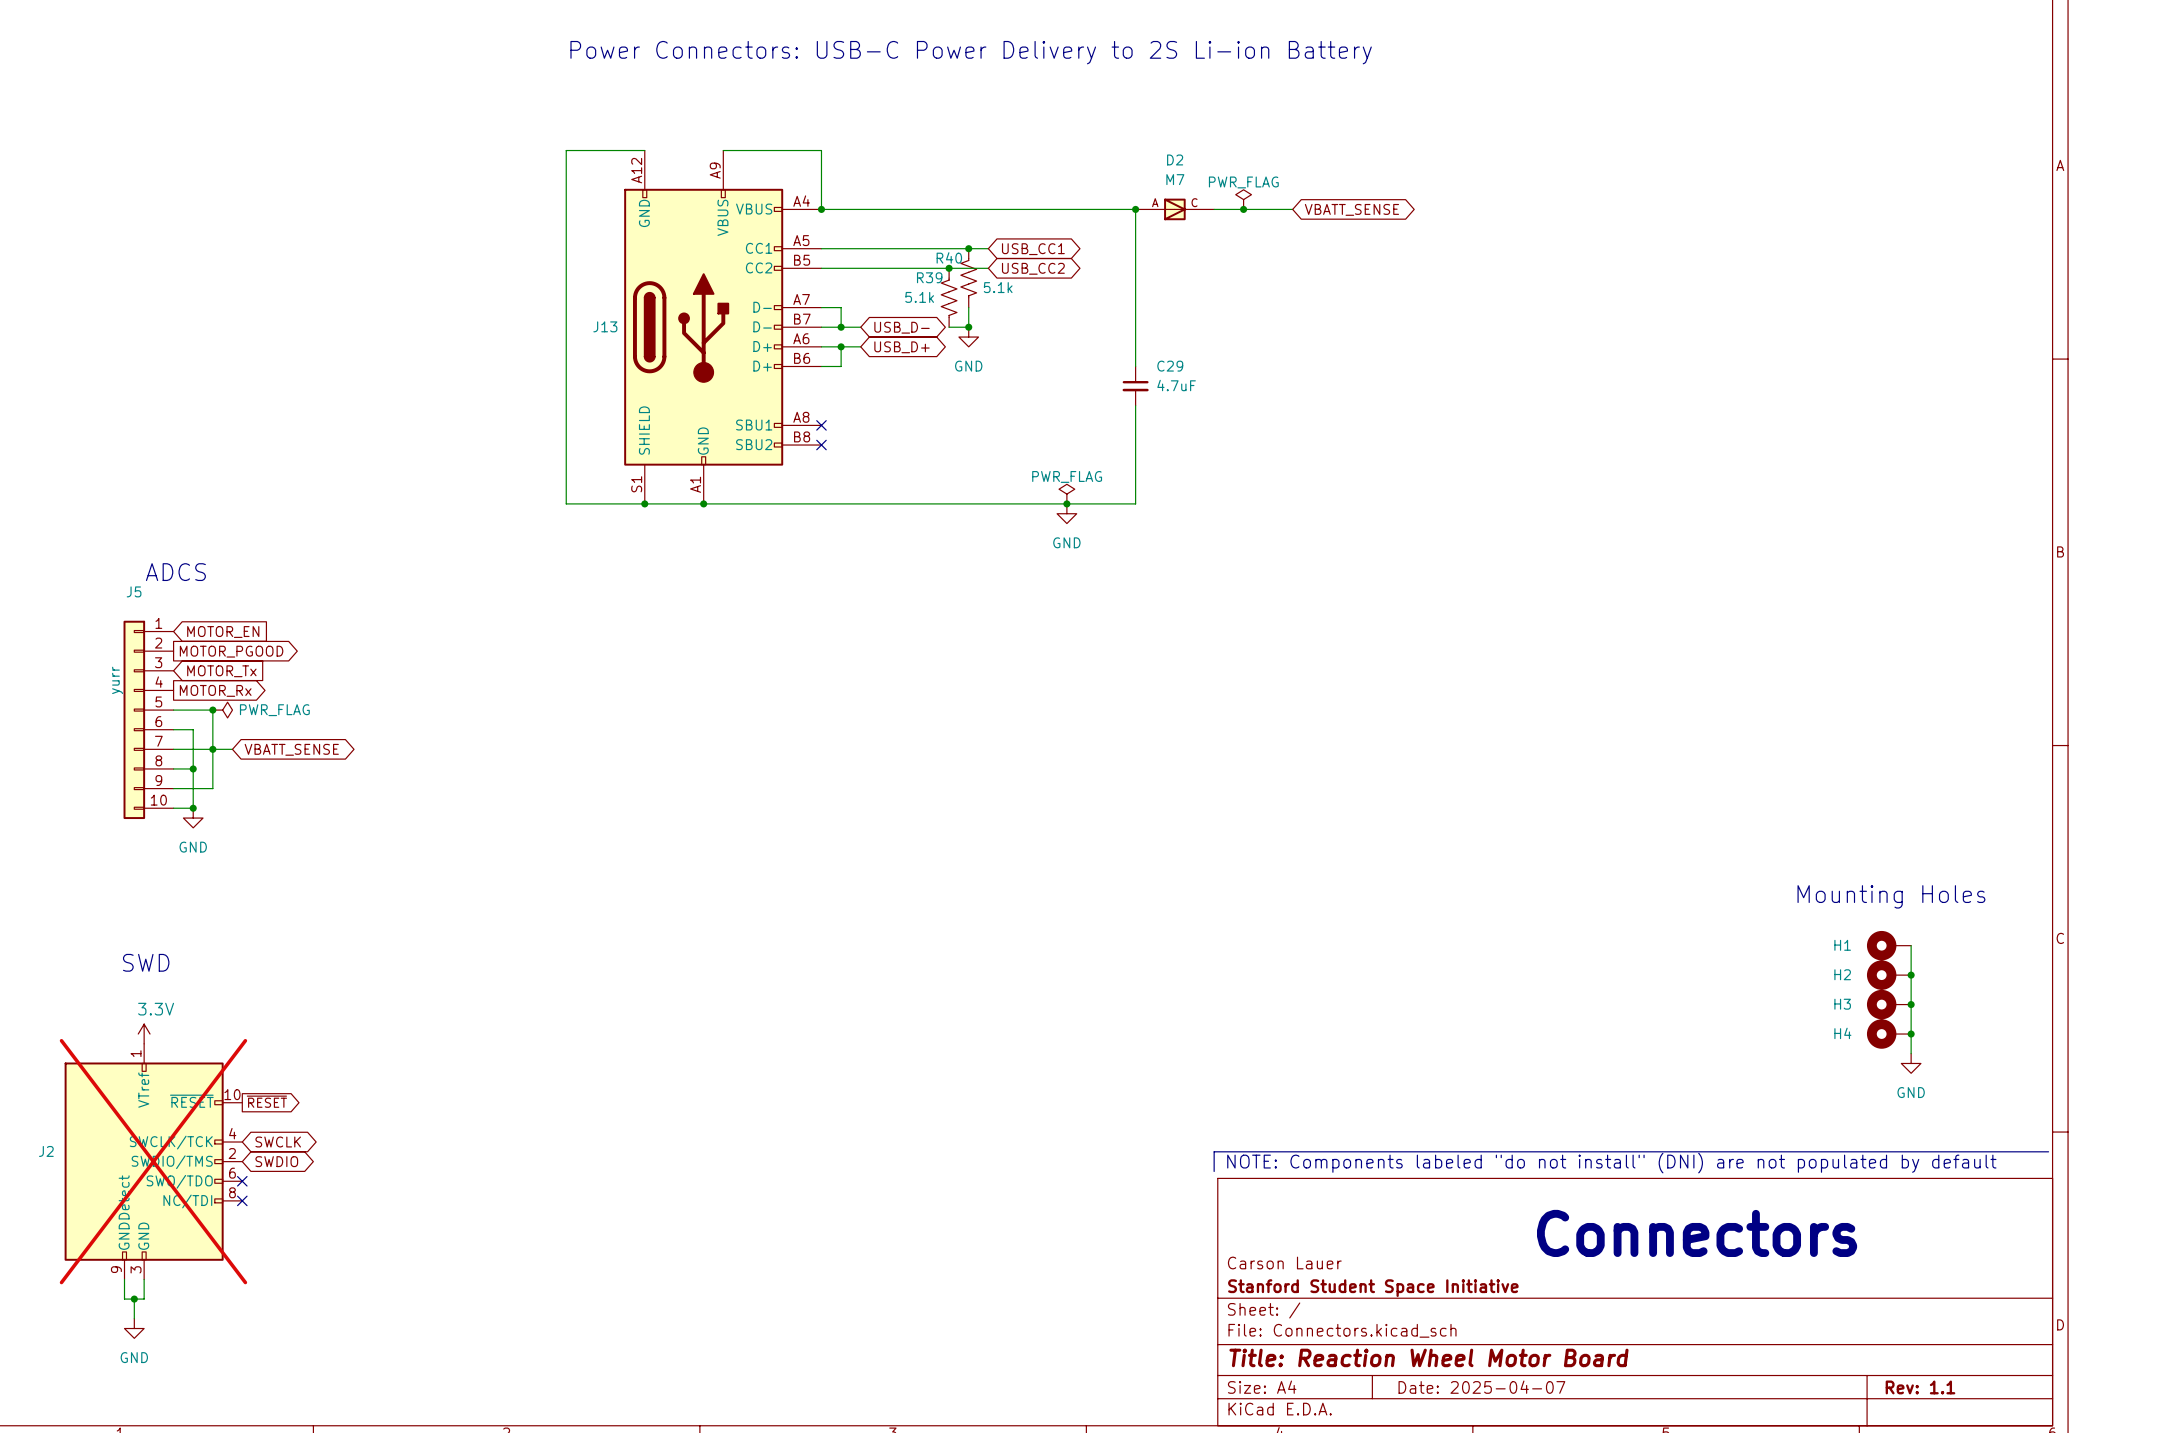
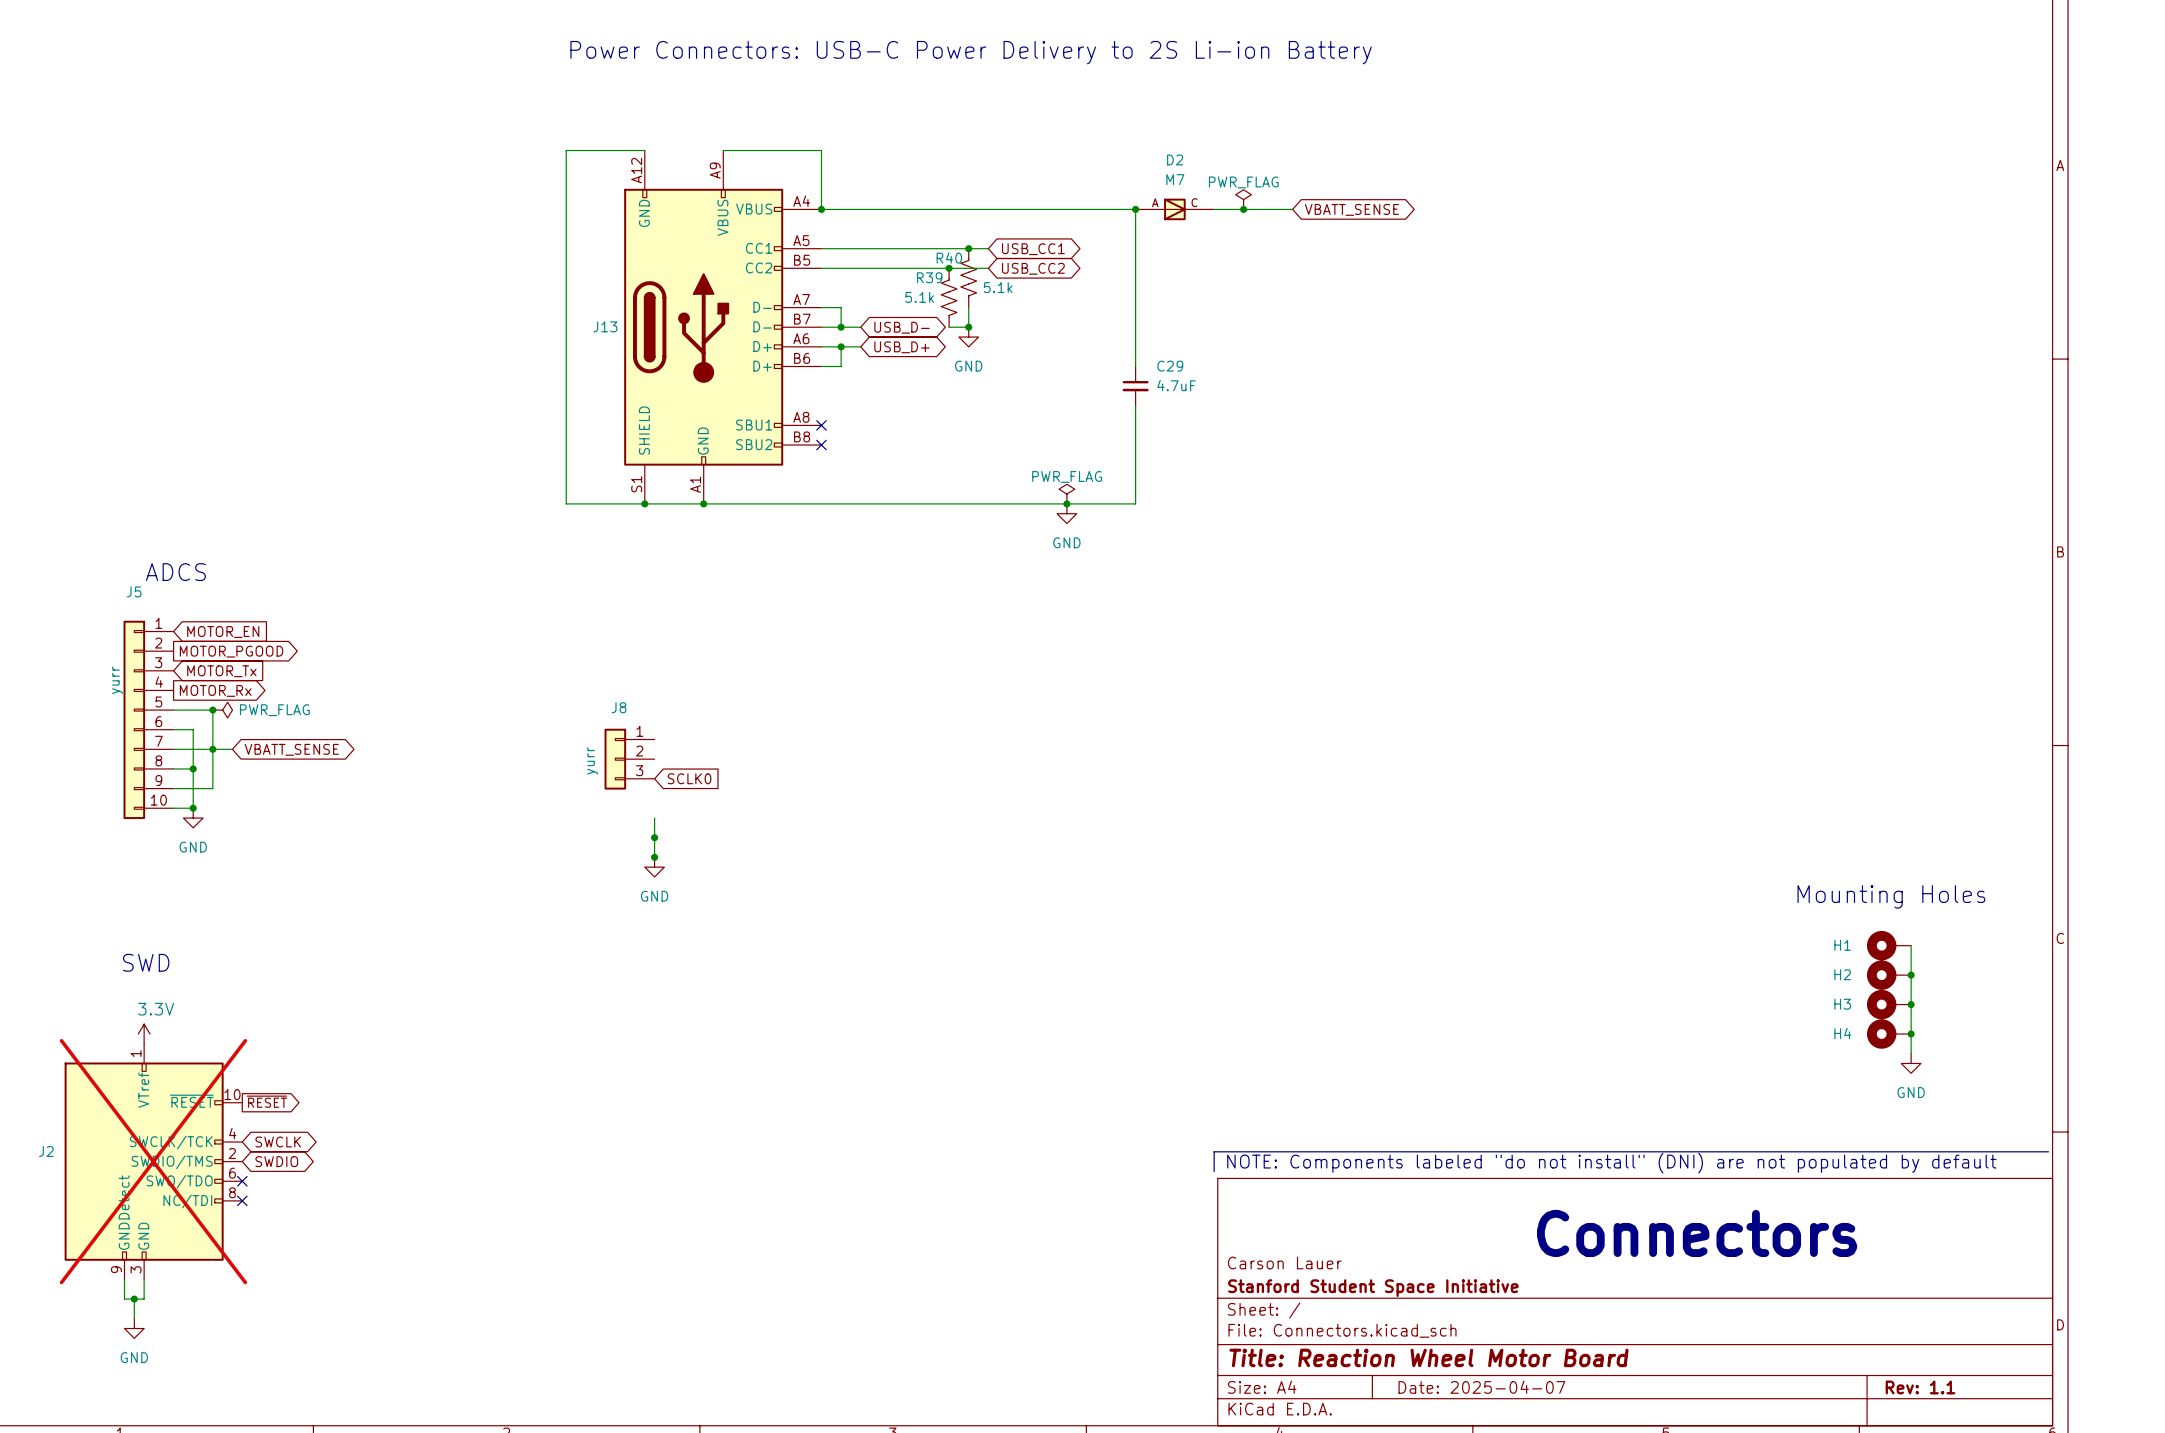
J8: none -> yurr (629, 759)
global label: none -> SCLK0 (689, 778)
wire: none -> (654, 818) (654, 857)
junction: none -> (654, 837)
junction: none -> (654, 857)
power symbol: none -> GND (654, 867)

